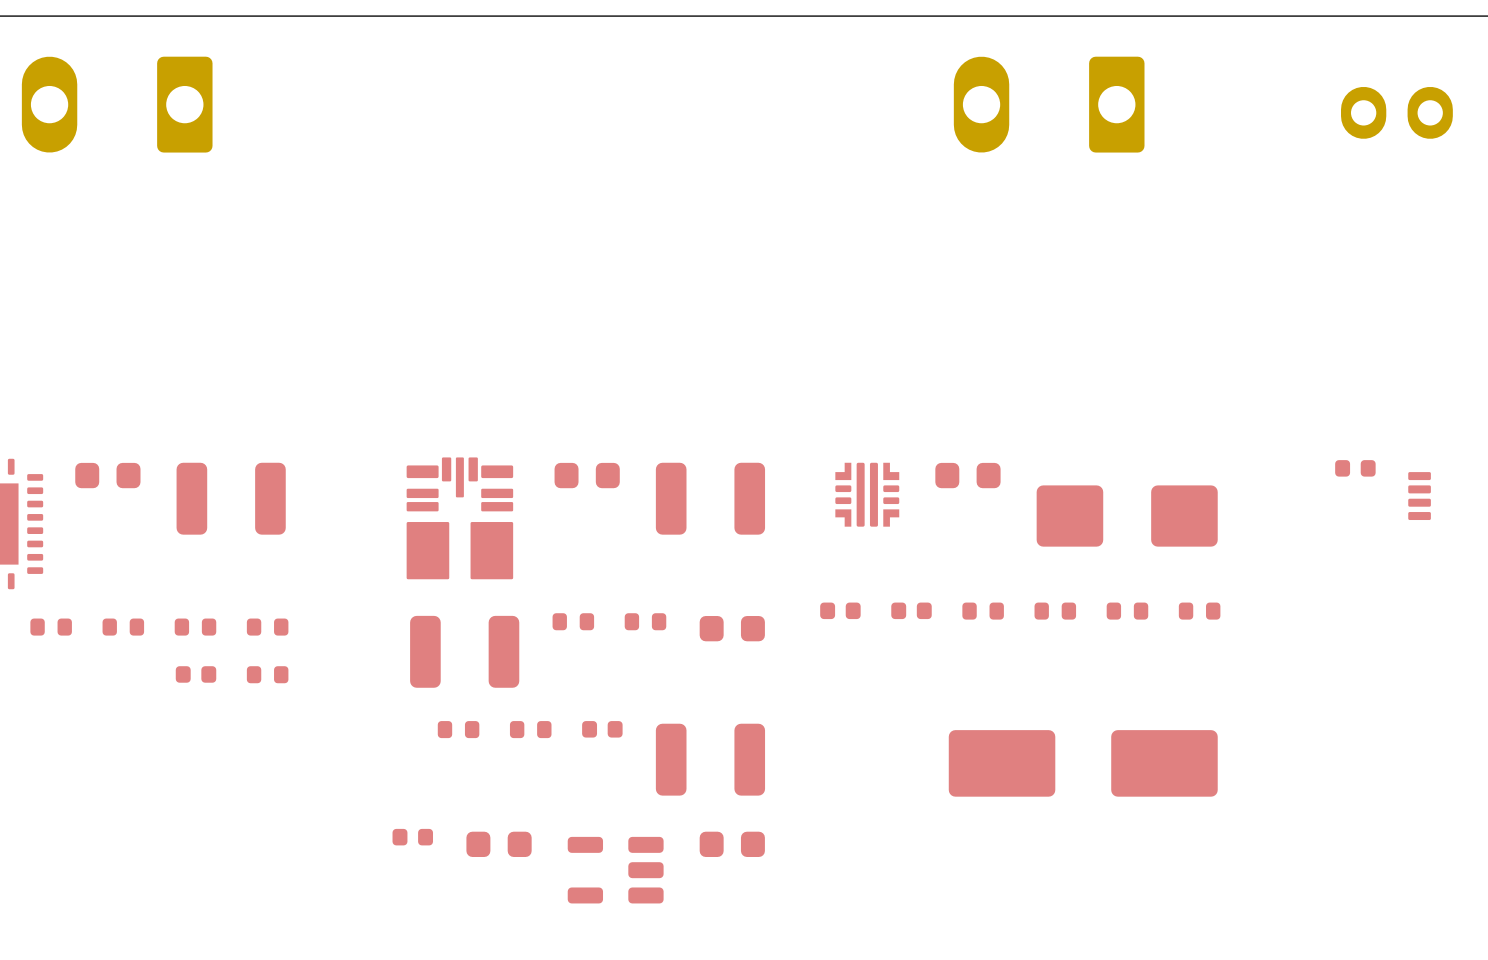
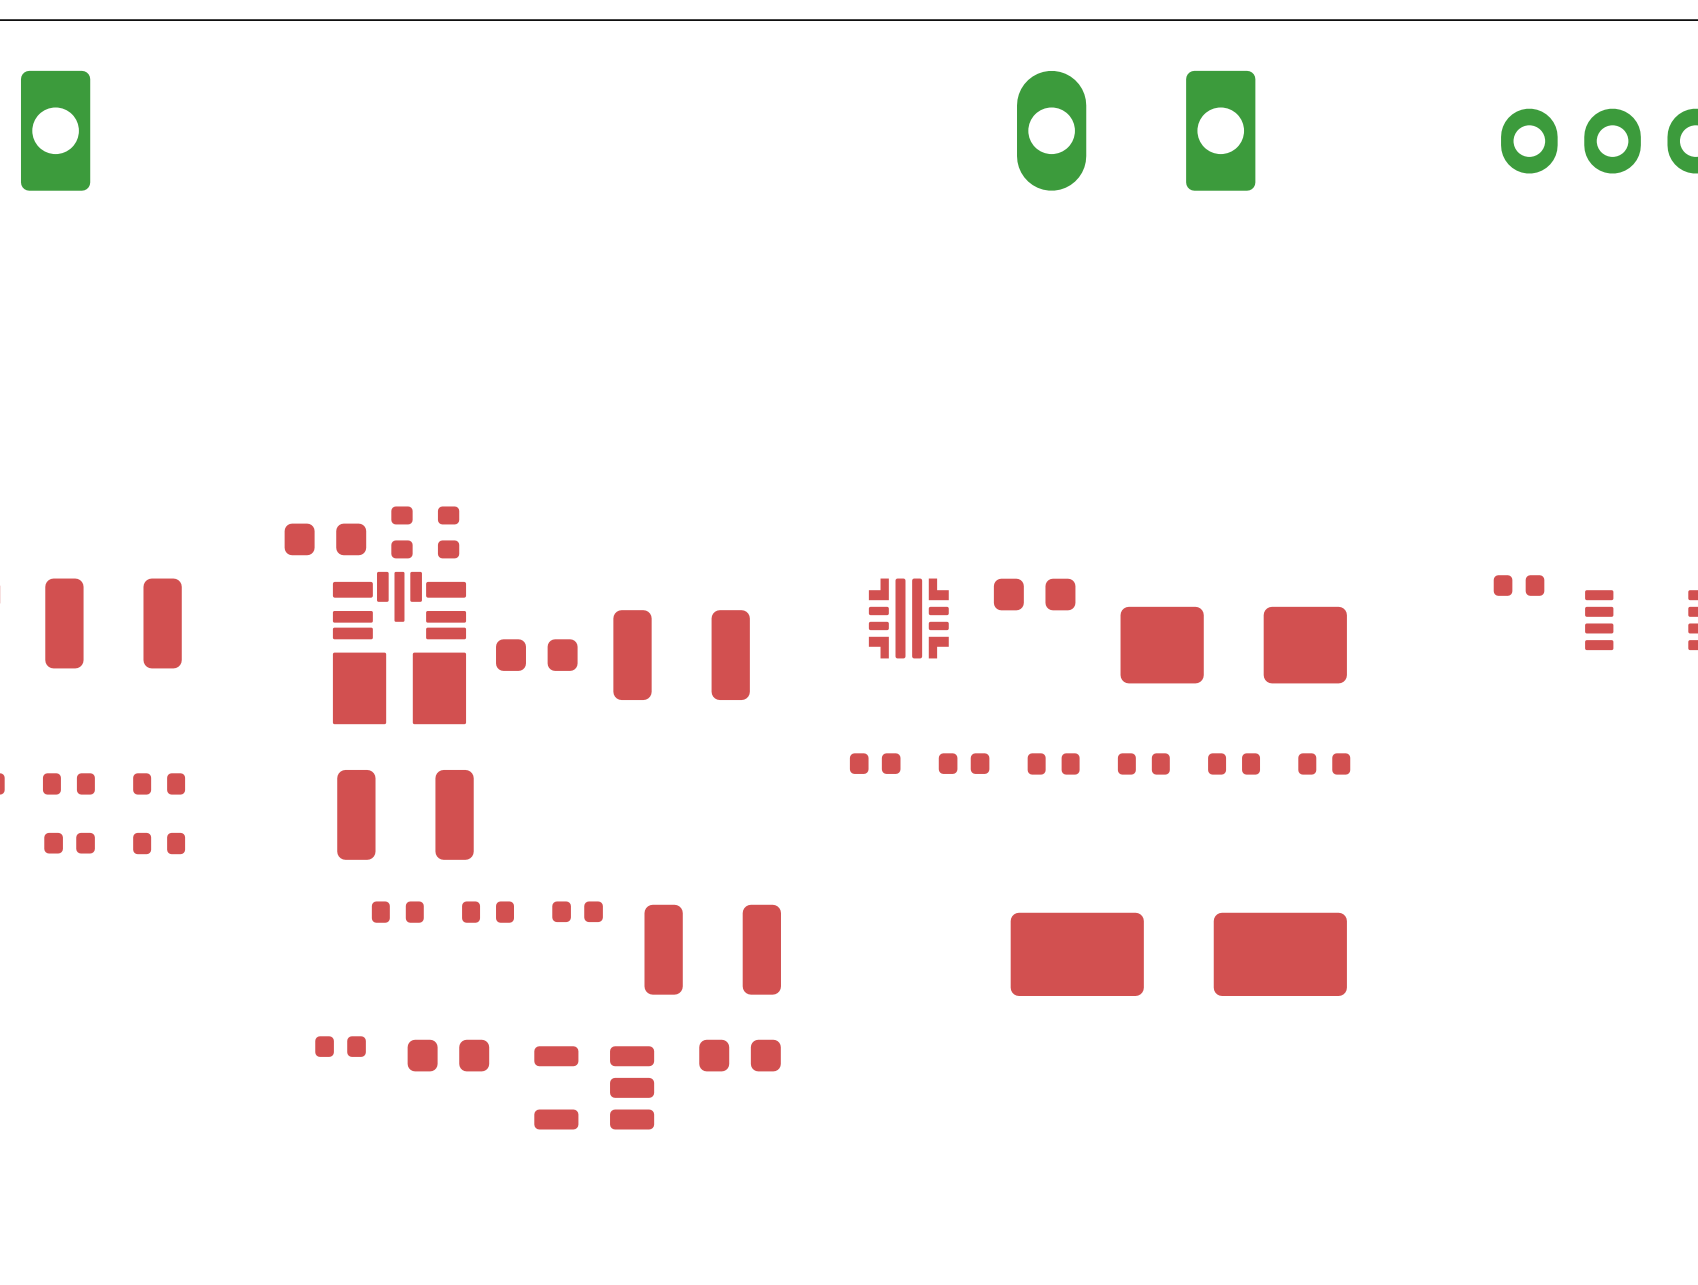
part: none -> (401, 532)
part: none -> (448, 532)
part: none -> (325, 539)
part position: (587, 475) -> (536, 655)
part position: (710, 498) -> (681, 655)
part: (573, 621) -> none
part: (645, 621) -> none
part: (732, 628) -> none

